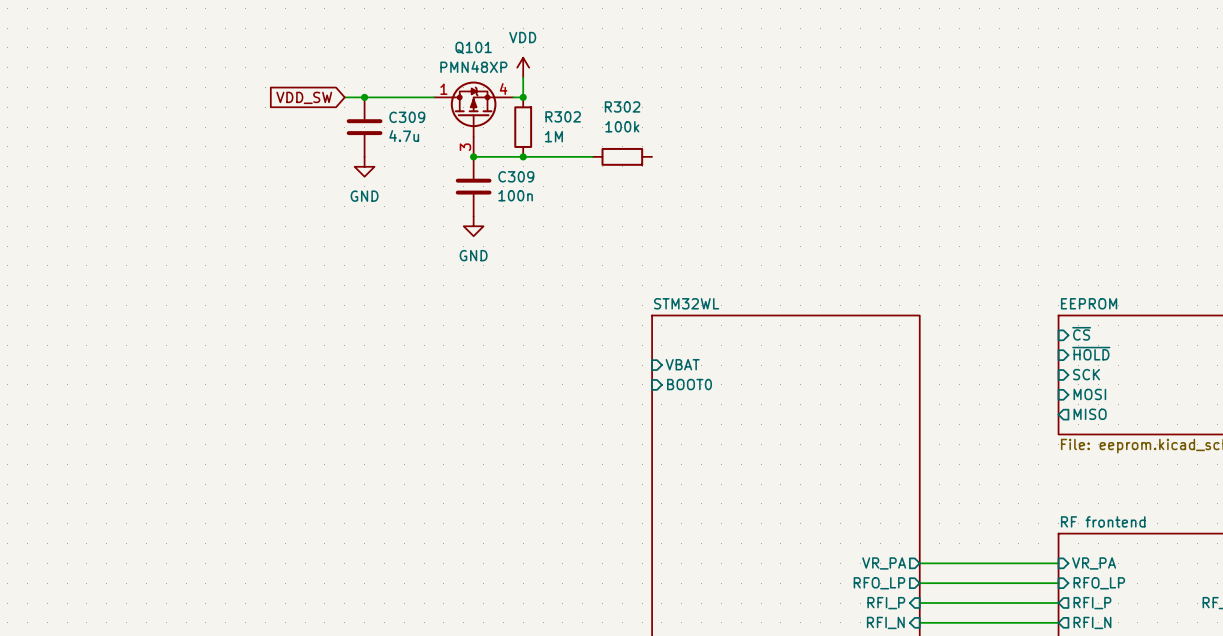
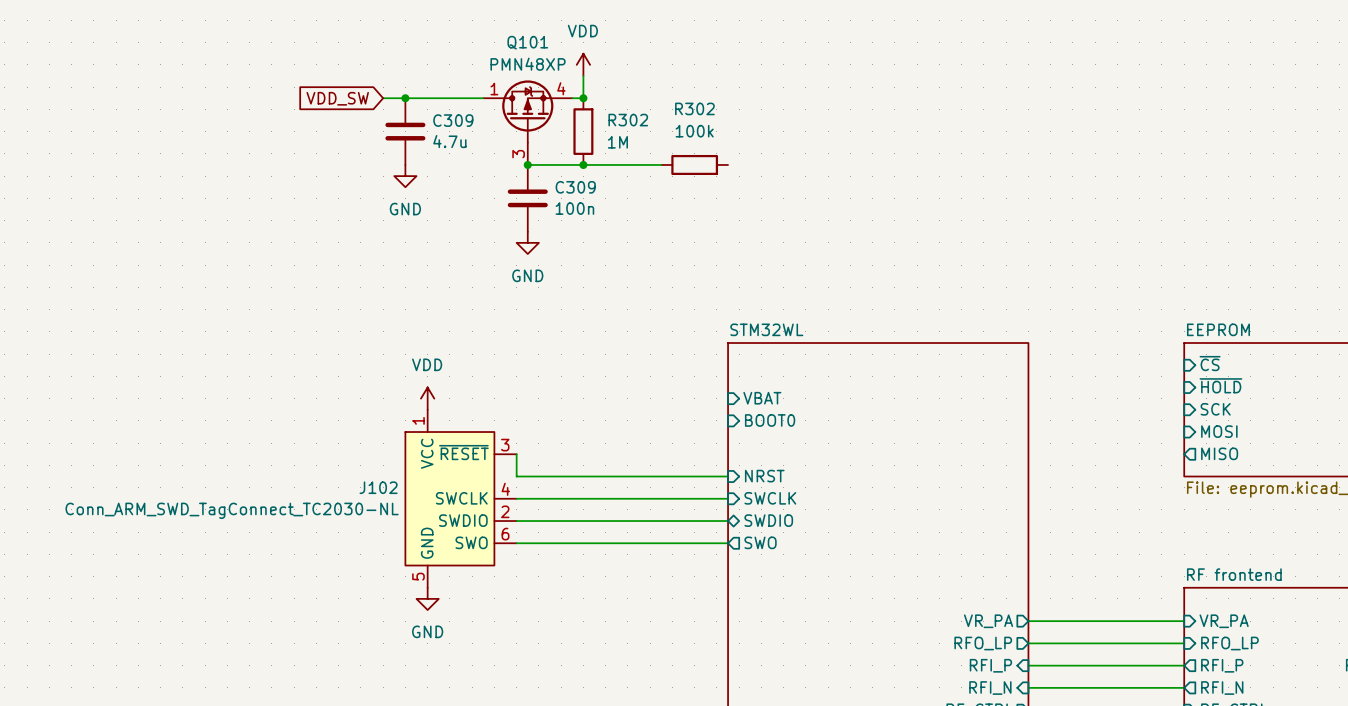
power symbol: none -> VDD (427, 398)
wire: none -> (516, 454) (516, 476) (728, 476)
sheet pin: none -> NRST (764, 476)
sheet pin: none -> SWCLK (770, 498)
J102: none -> Conn_ARM_SWD_TagConnect_TC2030-NL (461, 498)
wire: none -> (516, 498) (728, 498)
sheet pin: none -> SWDIO (768, 520)
wire: none -> (516, 521) (728, 521)
wire: none -> (516, 543) (728, 543)
sheet pin: none -> SWO (760, 542)
power symbol: none -> GND (427, 598)

